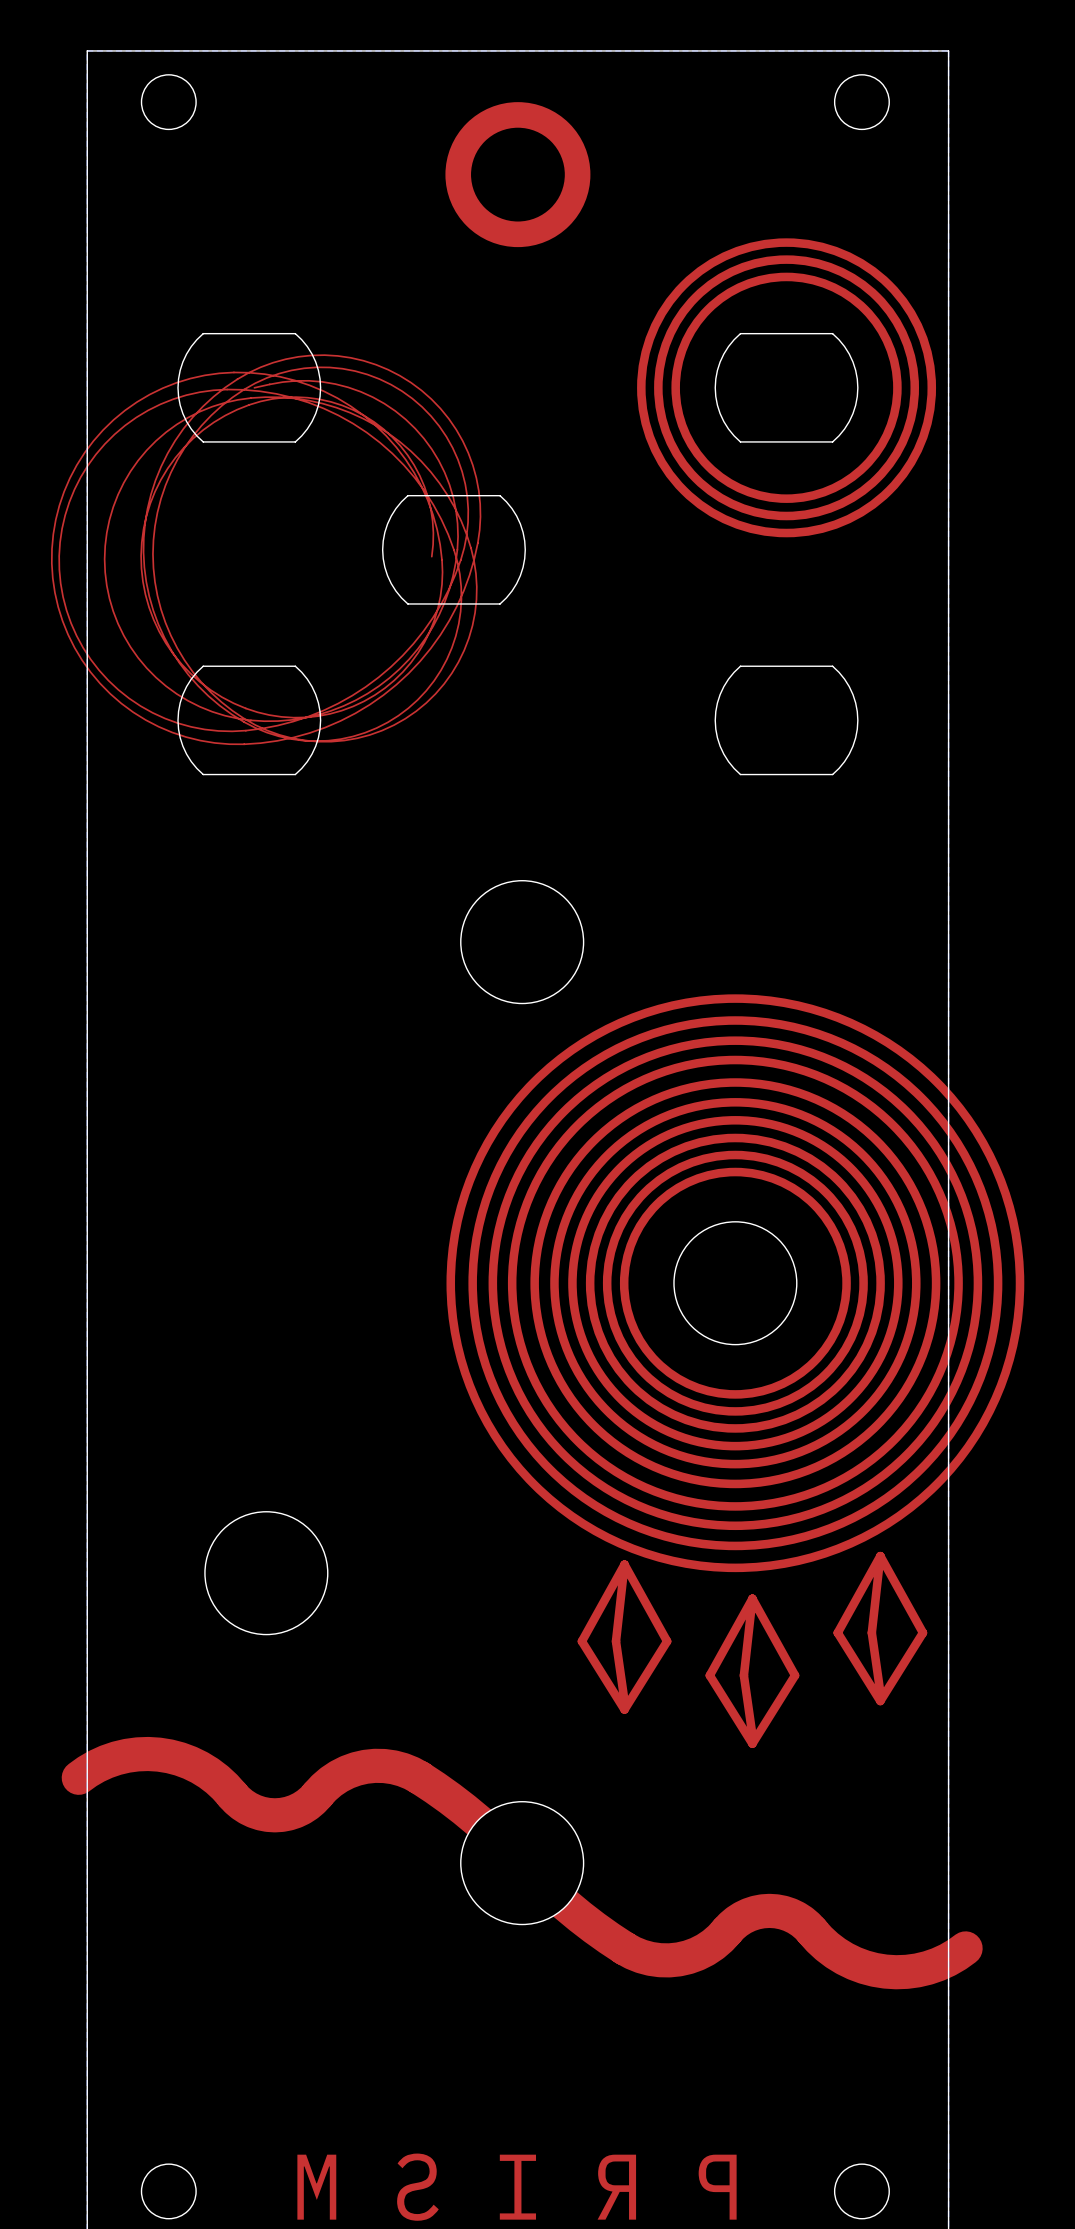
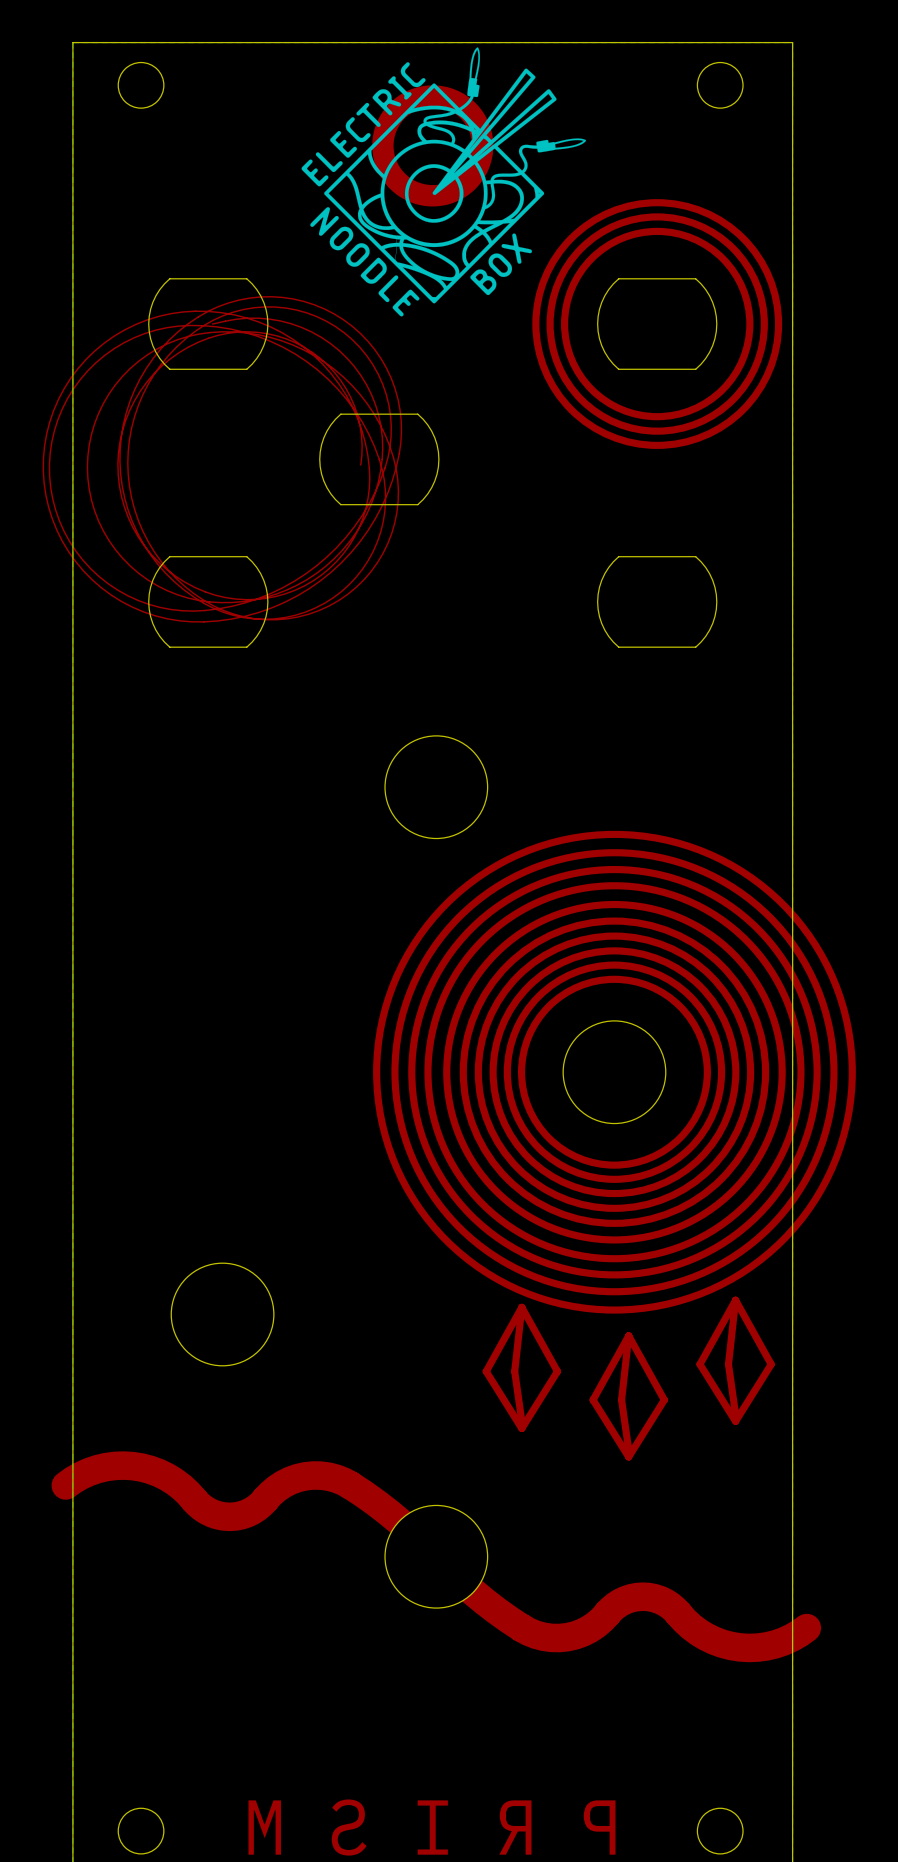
drawing: none -> [301, 47, 586, 317]

